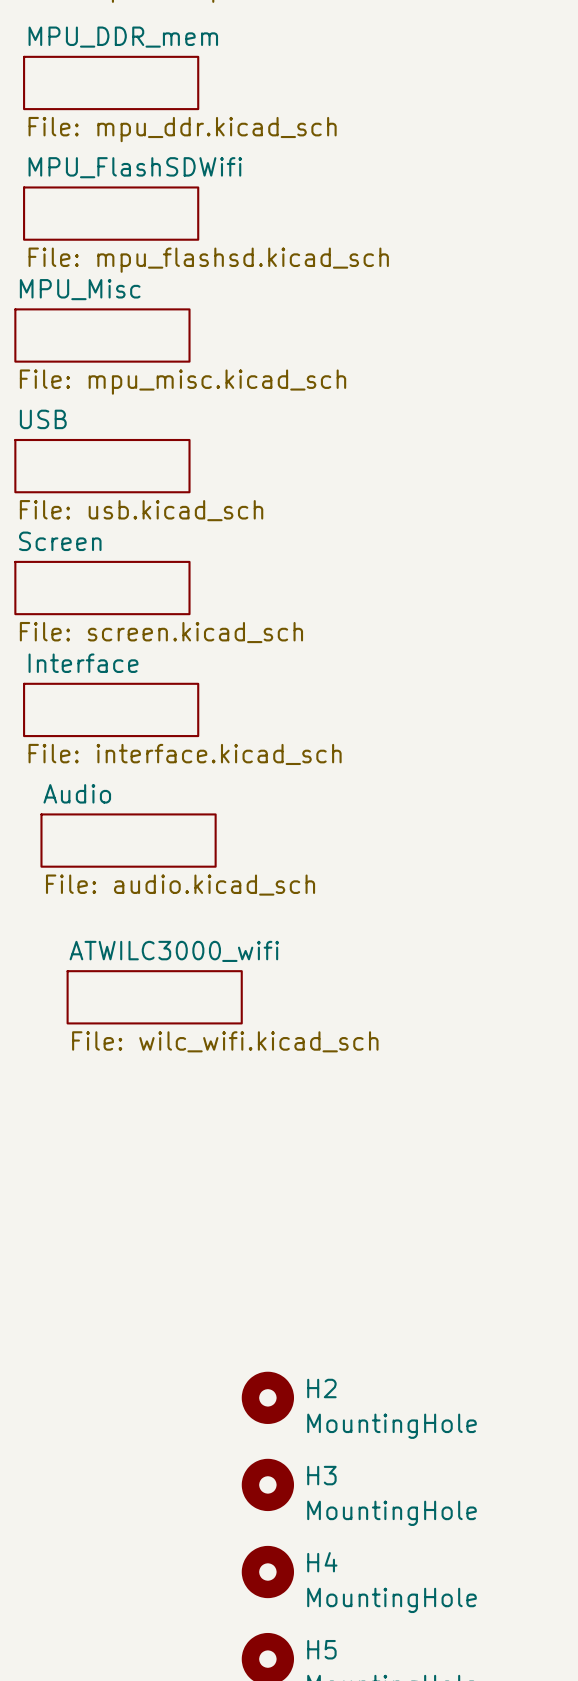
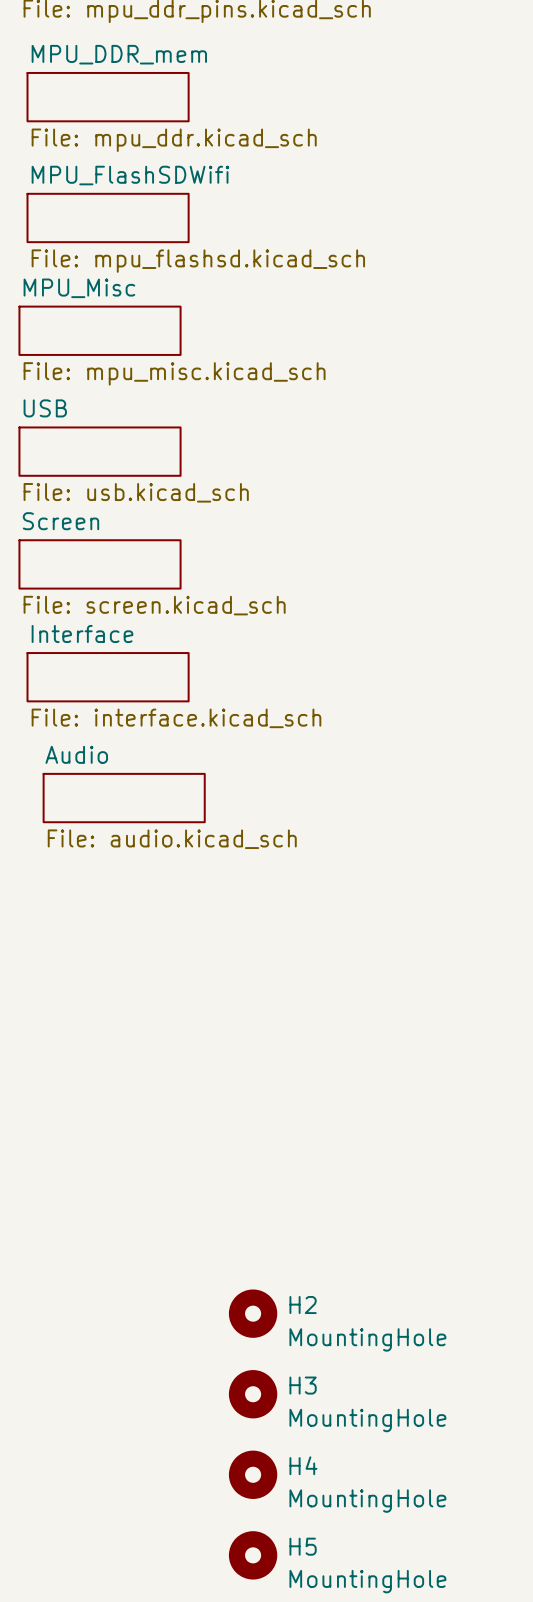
sheet ATWILC3000_wifi: File: wilc_wifi.kicad_sch (154, 997) -> none

